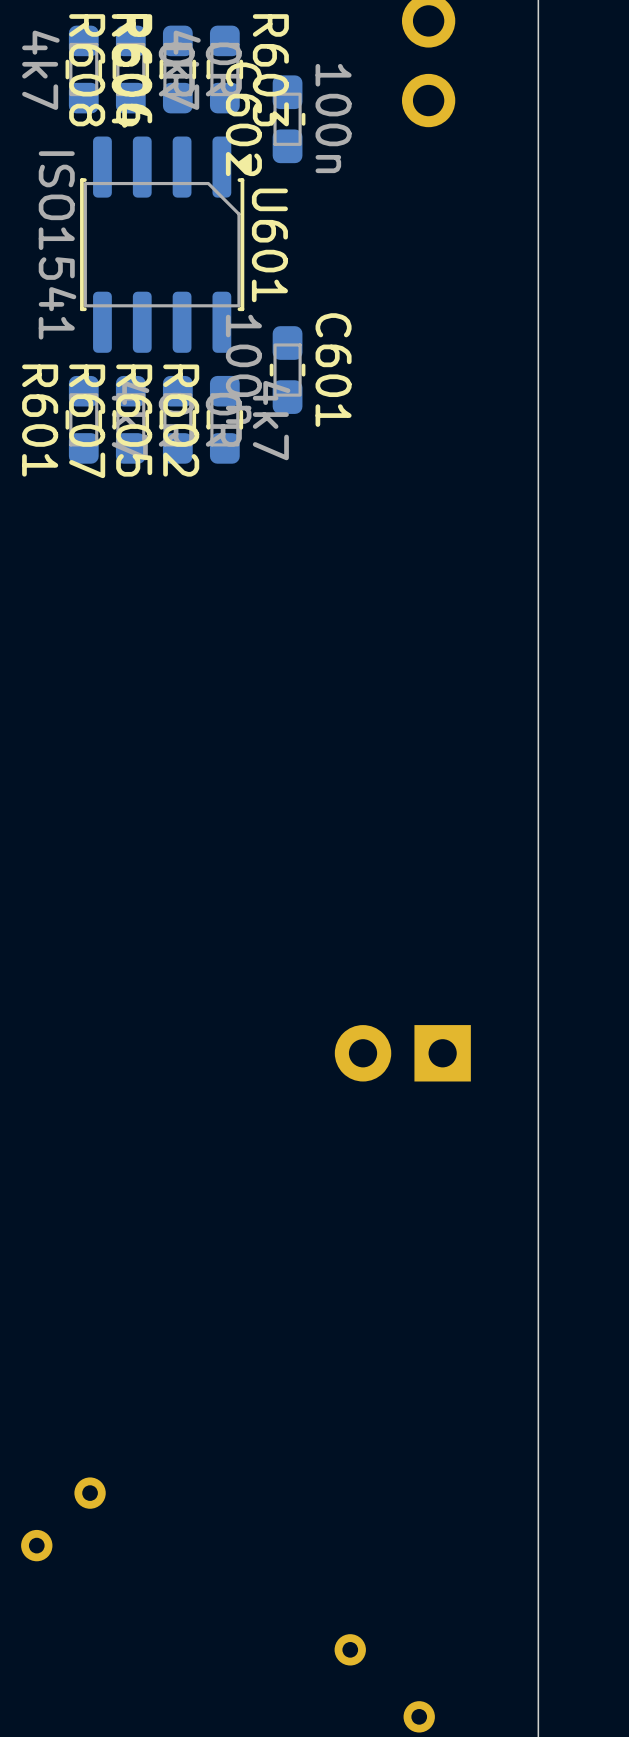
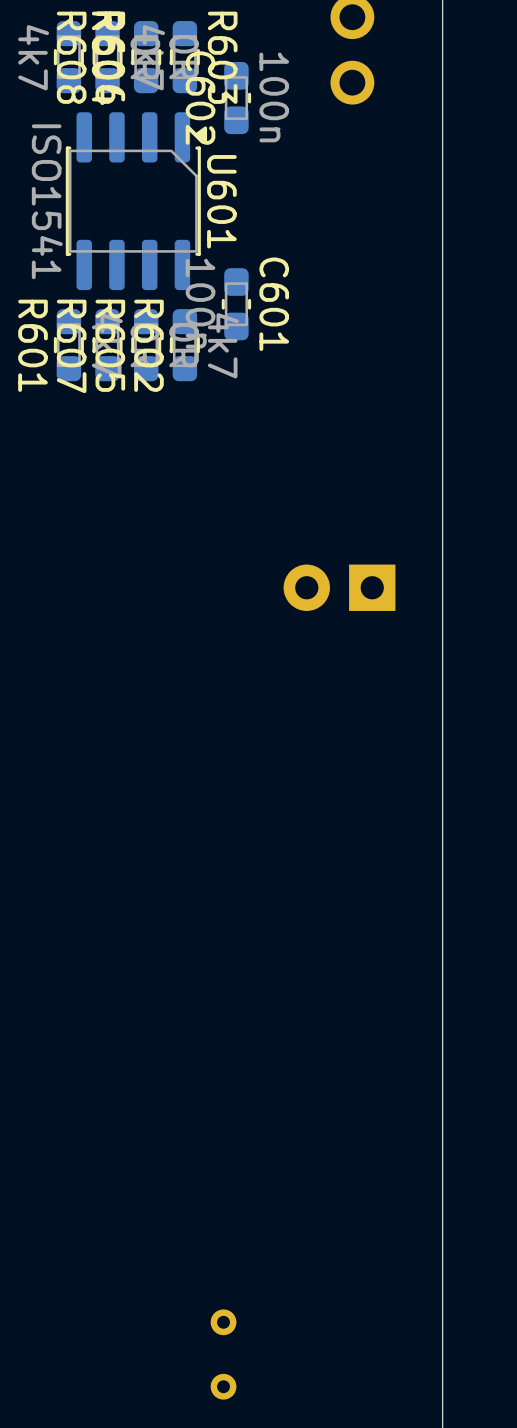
part position: (402, 1053) -> (339, 587)
part: (90, 1493) -> none
part: (36, 1545) -> none
part: none -> (223, 1322)
part: (350, 1649) -> none
part: none -> (223, 1386)
part: (419, 1716) -> none

